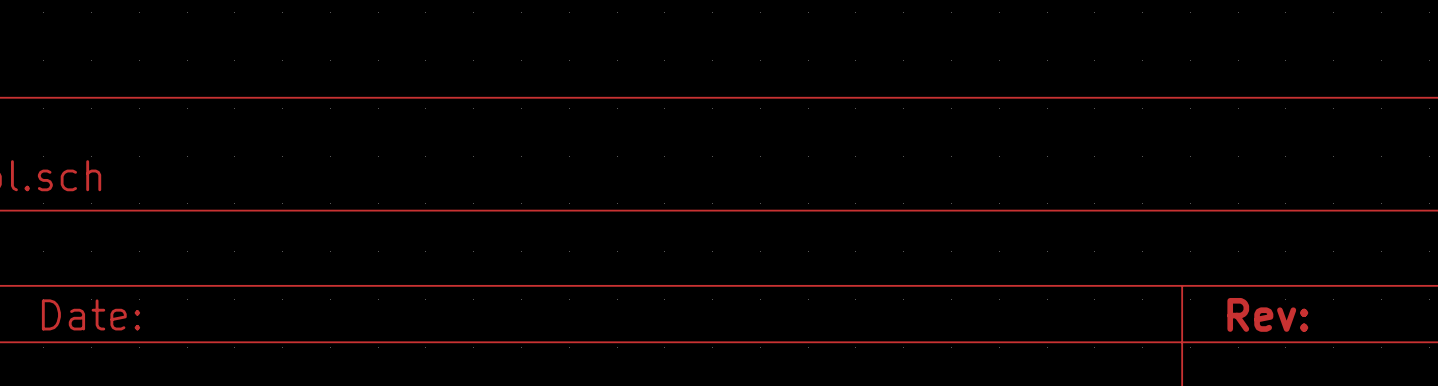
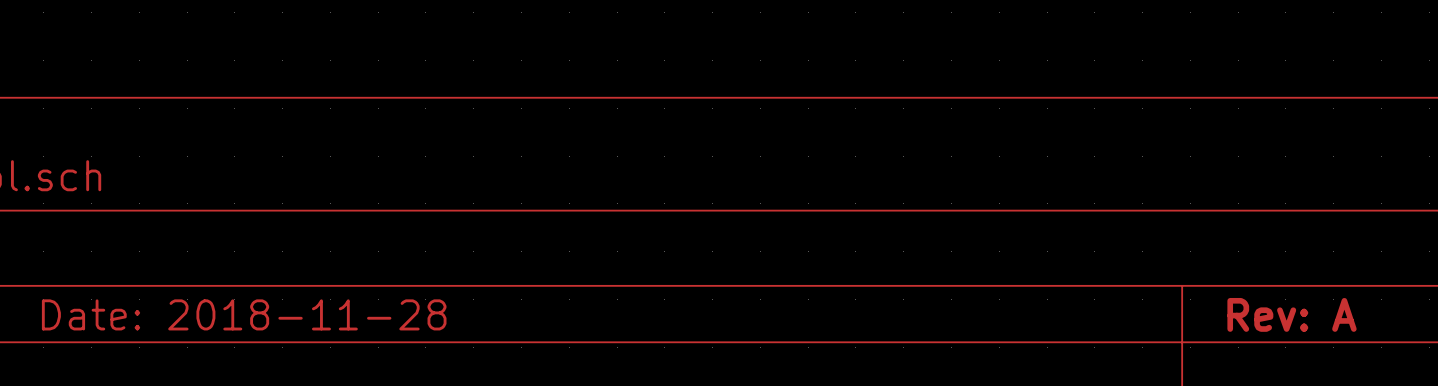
title block: Date: (91, 314) -> Date: 2018-11-28 (244, 314)
title block: Rev: (1267, 314) -> Rev: A (1292, 314)

